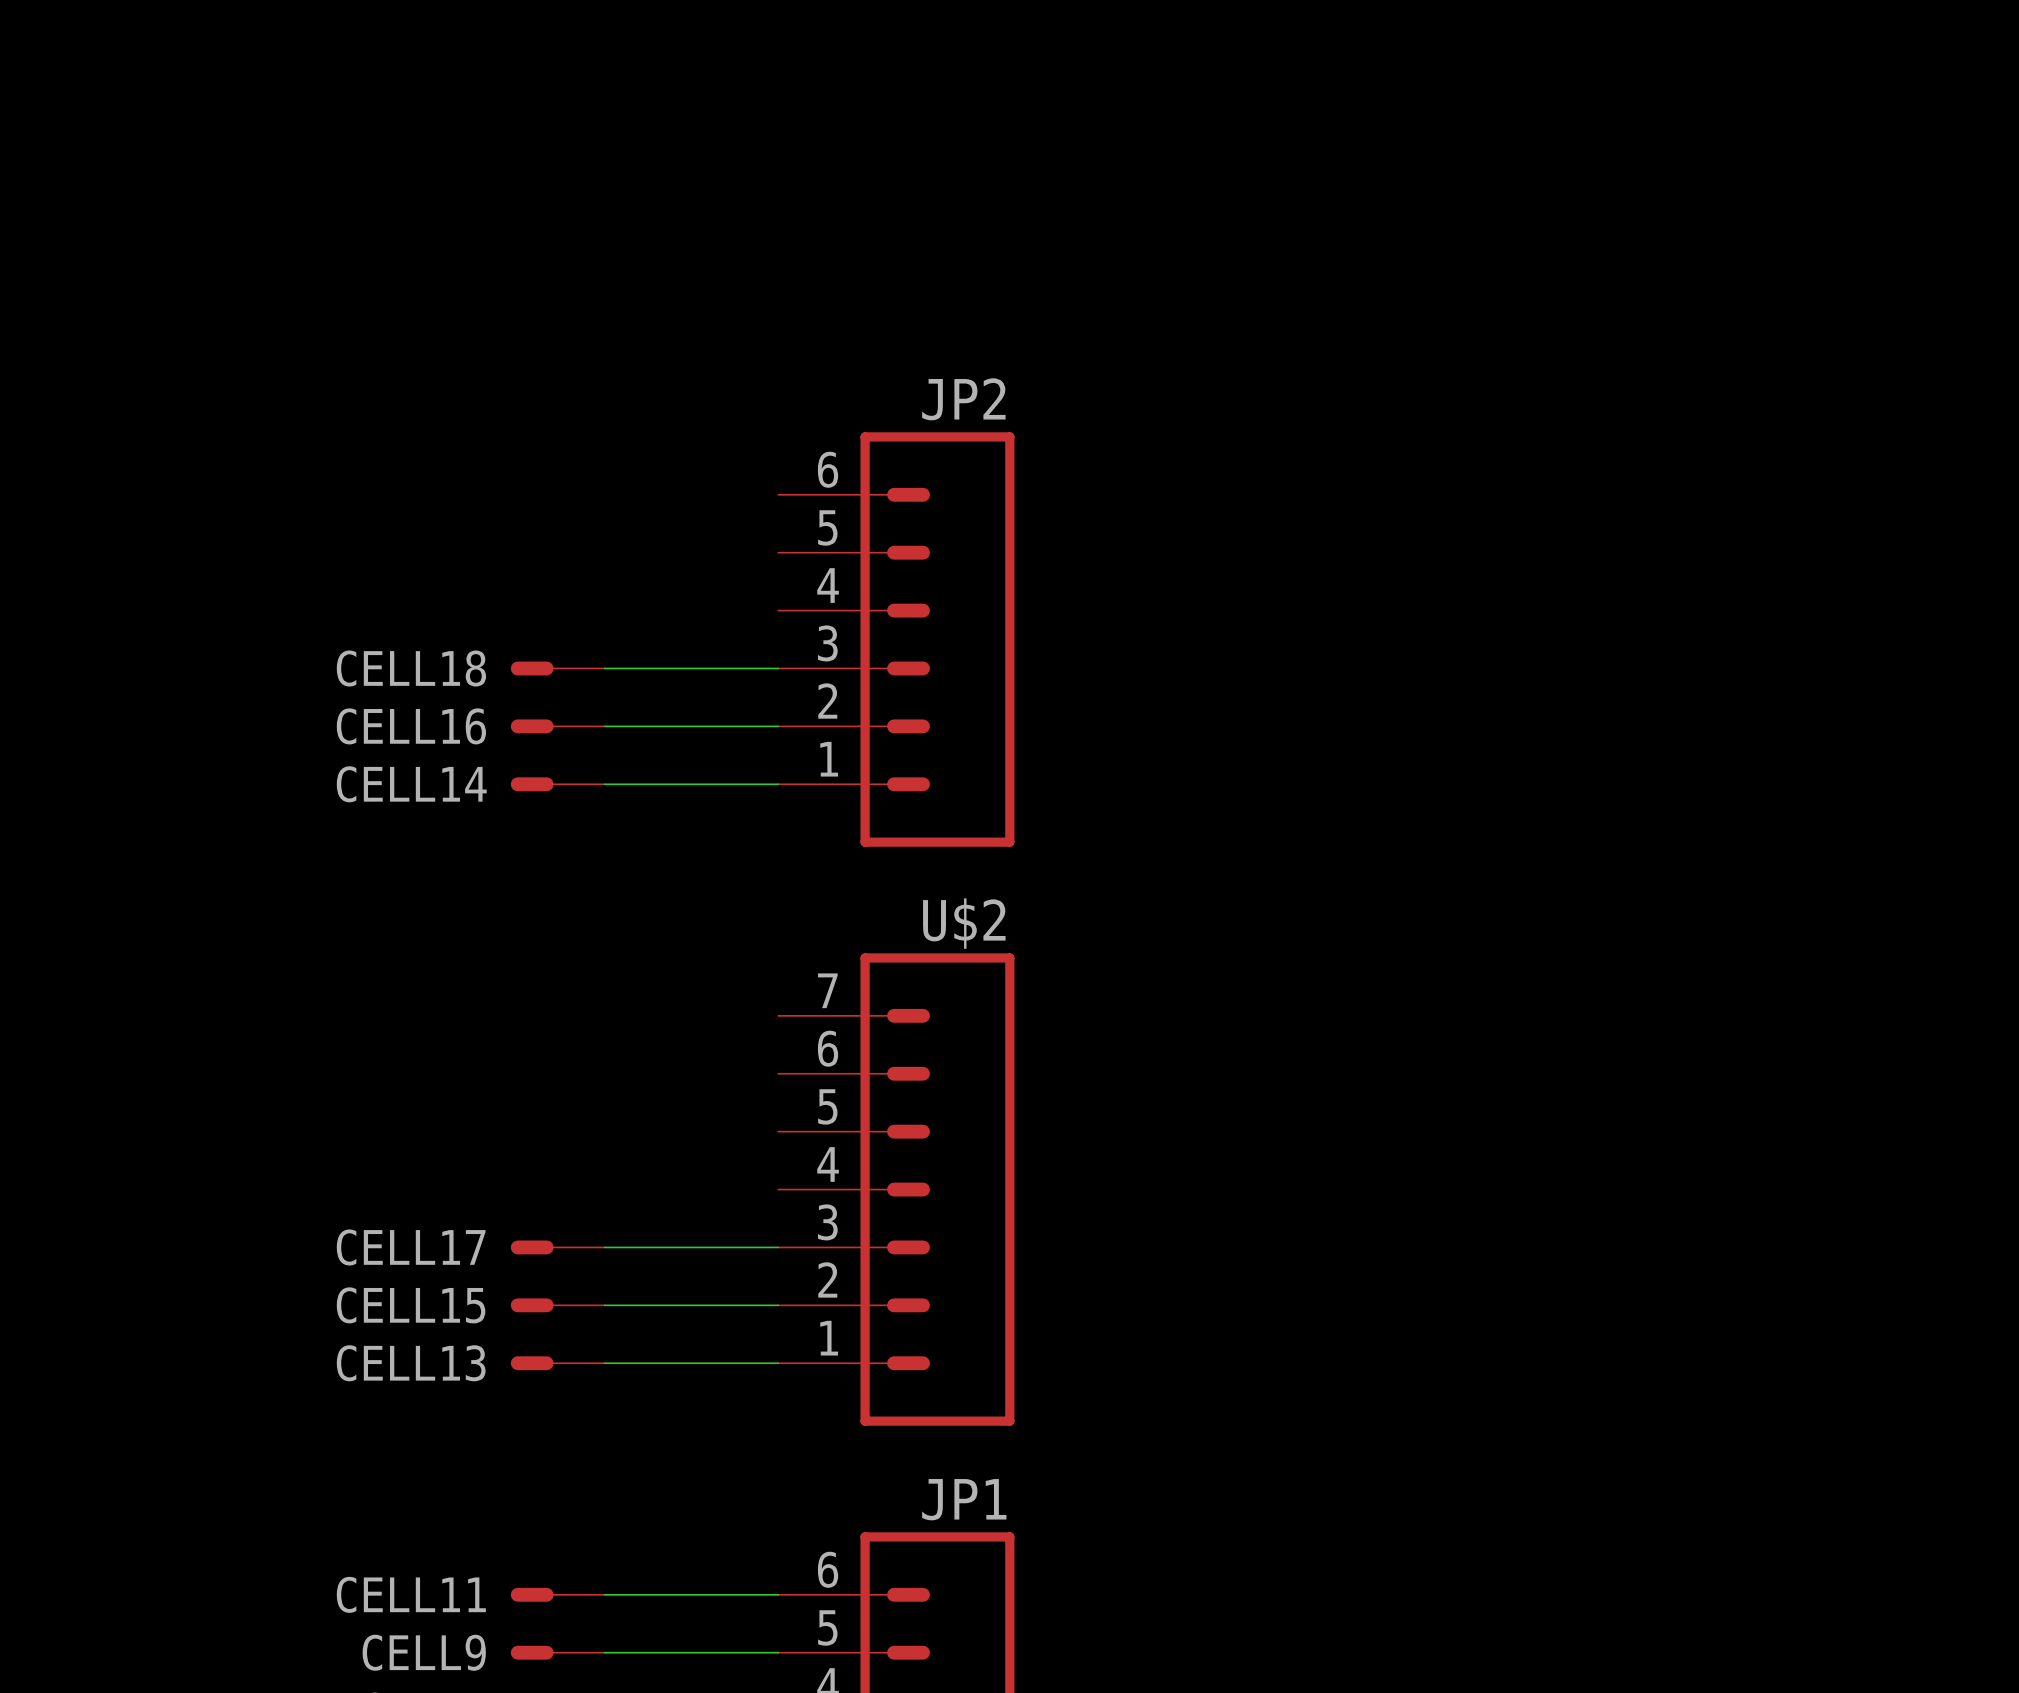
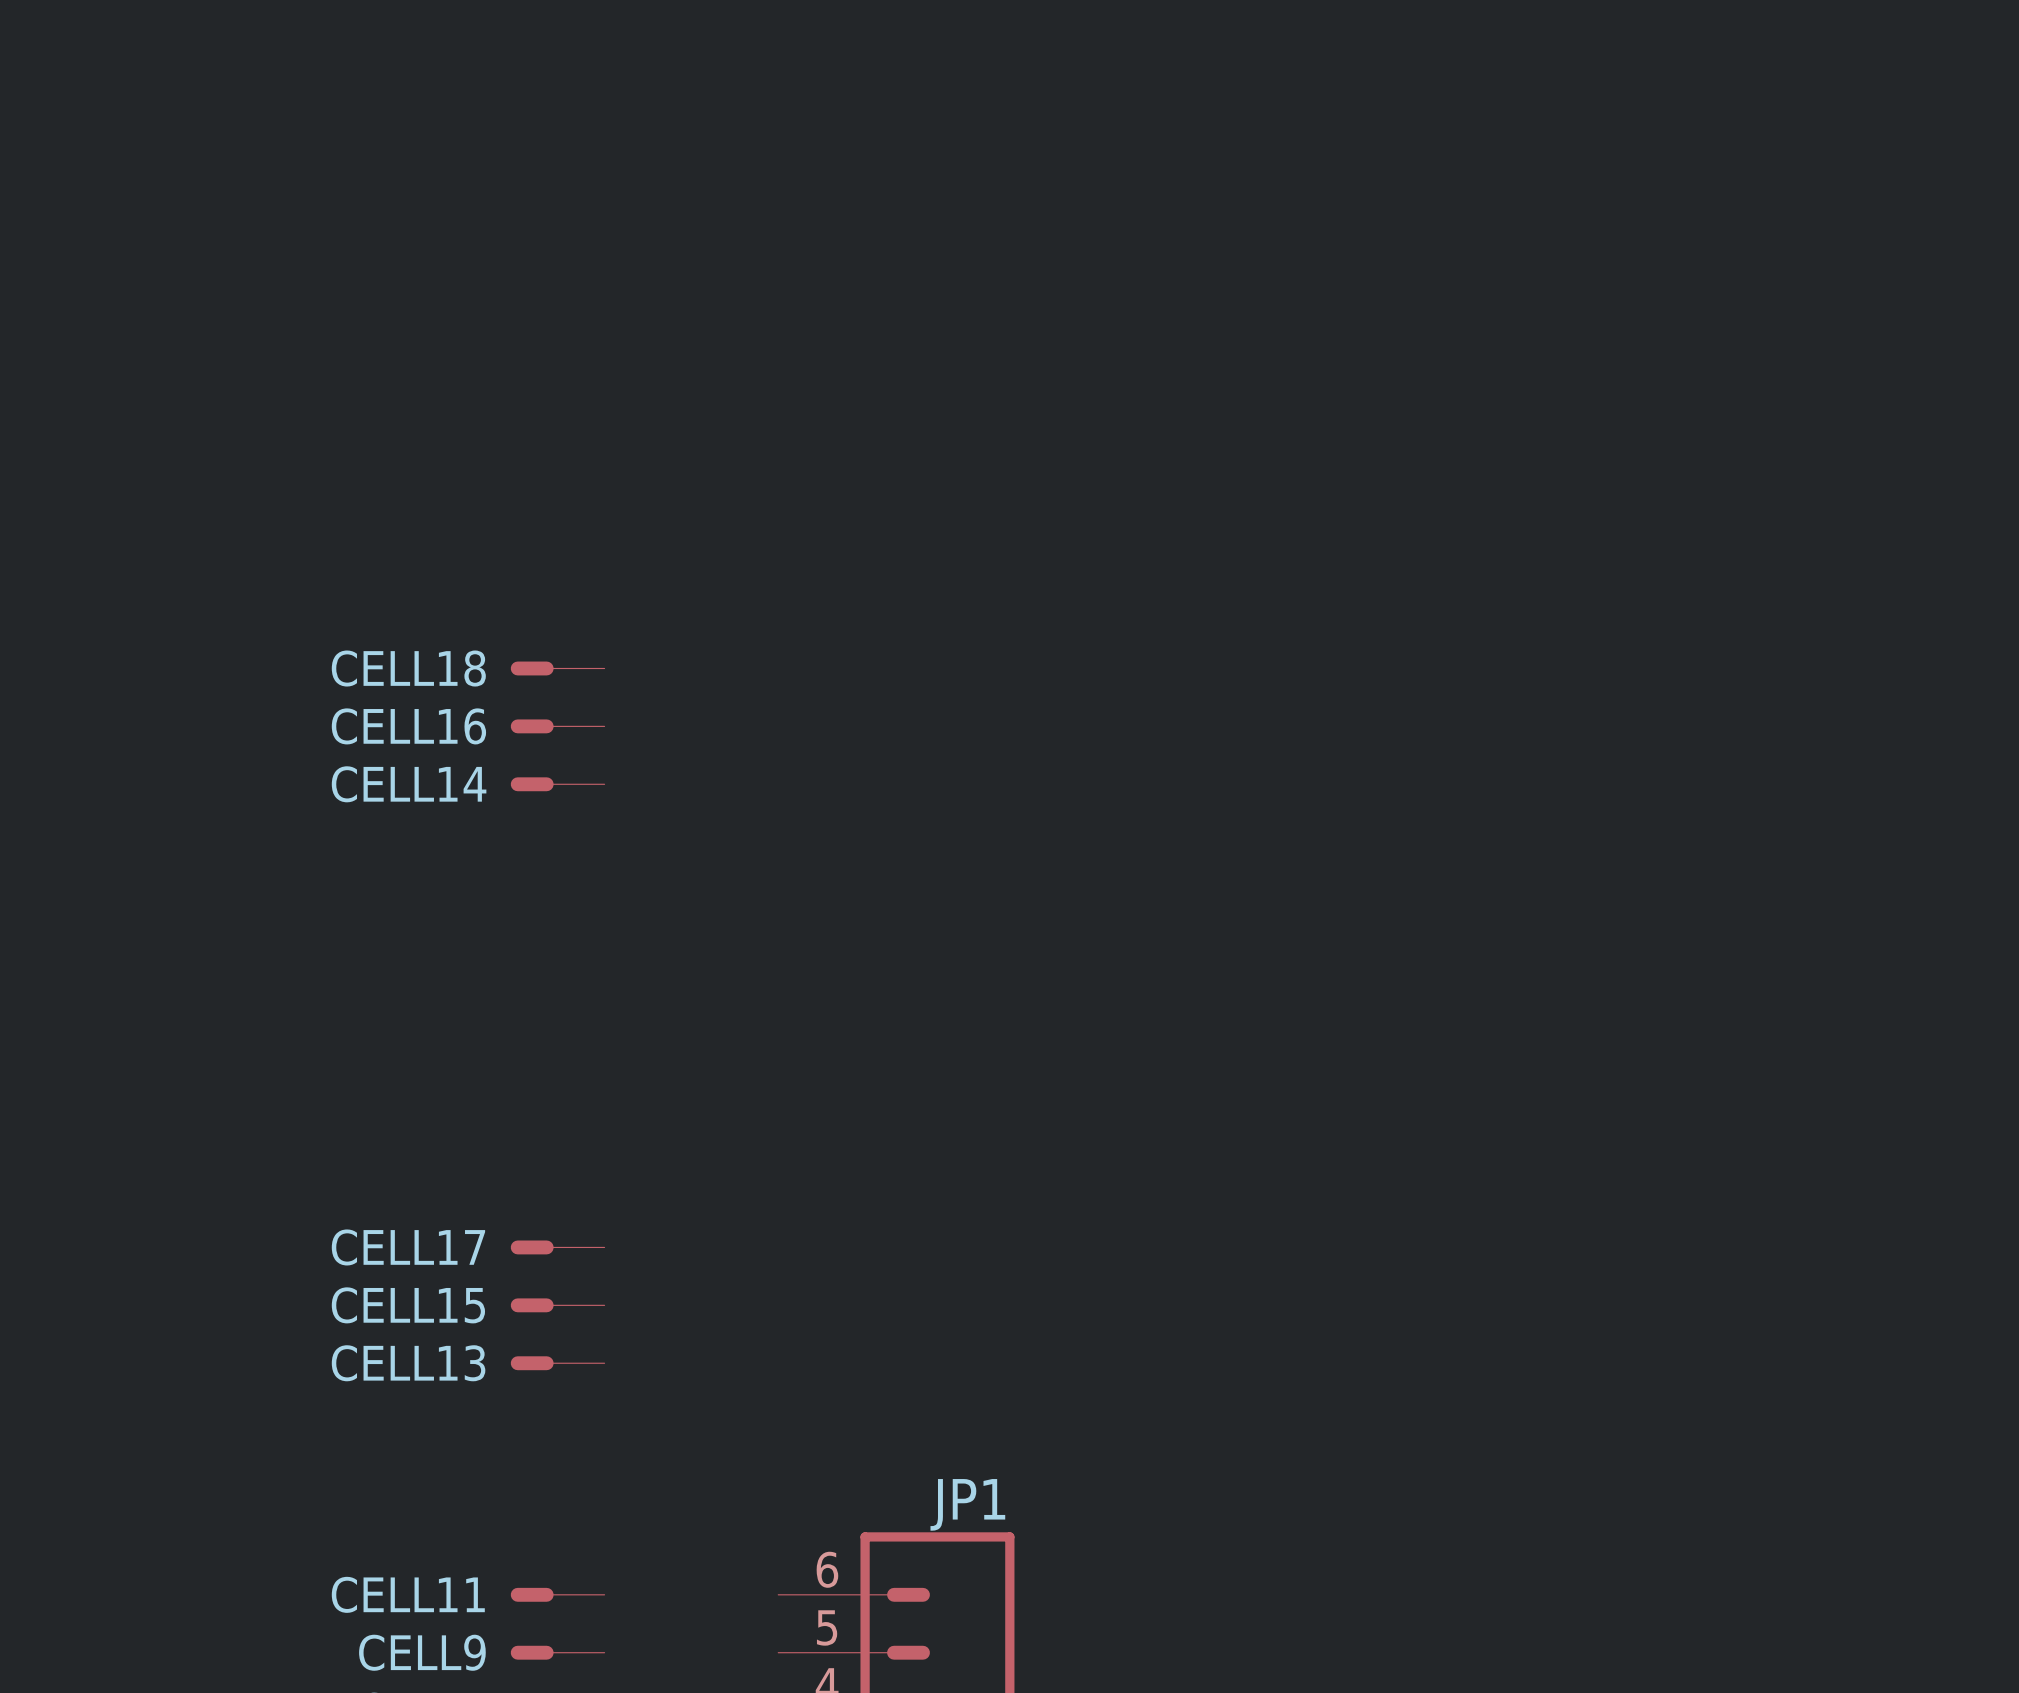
JP2: (896, 639) -> none
wire: (604, 668) (778, 668) -> none
wire: (604, 726) (778, 726) -> none
wire: (604, 784) (778, 784) -> none
U$2: (896, 1189) -> none
wire: (604, 1247) (778, 1247) -> none
wire: (604, 1305) (778, 1305) -> none
wire: (604, 1363) (778, 1363) -> none
wire: (604, 1594) (778, 1594) -> none
wire: (604, 1652) (778, 1652) -> none

